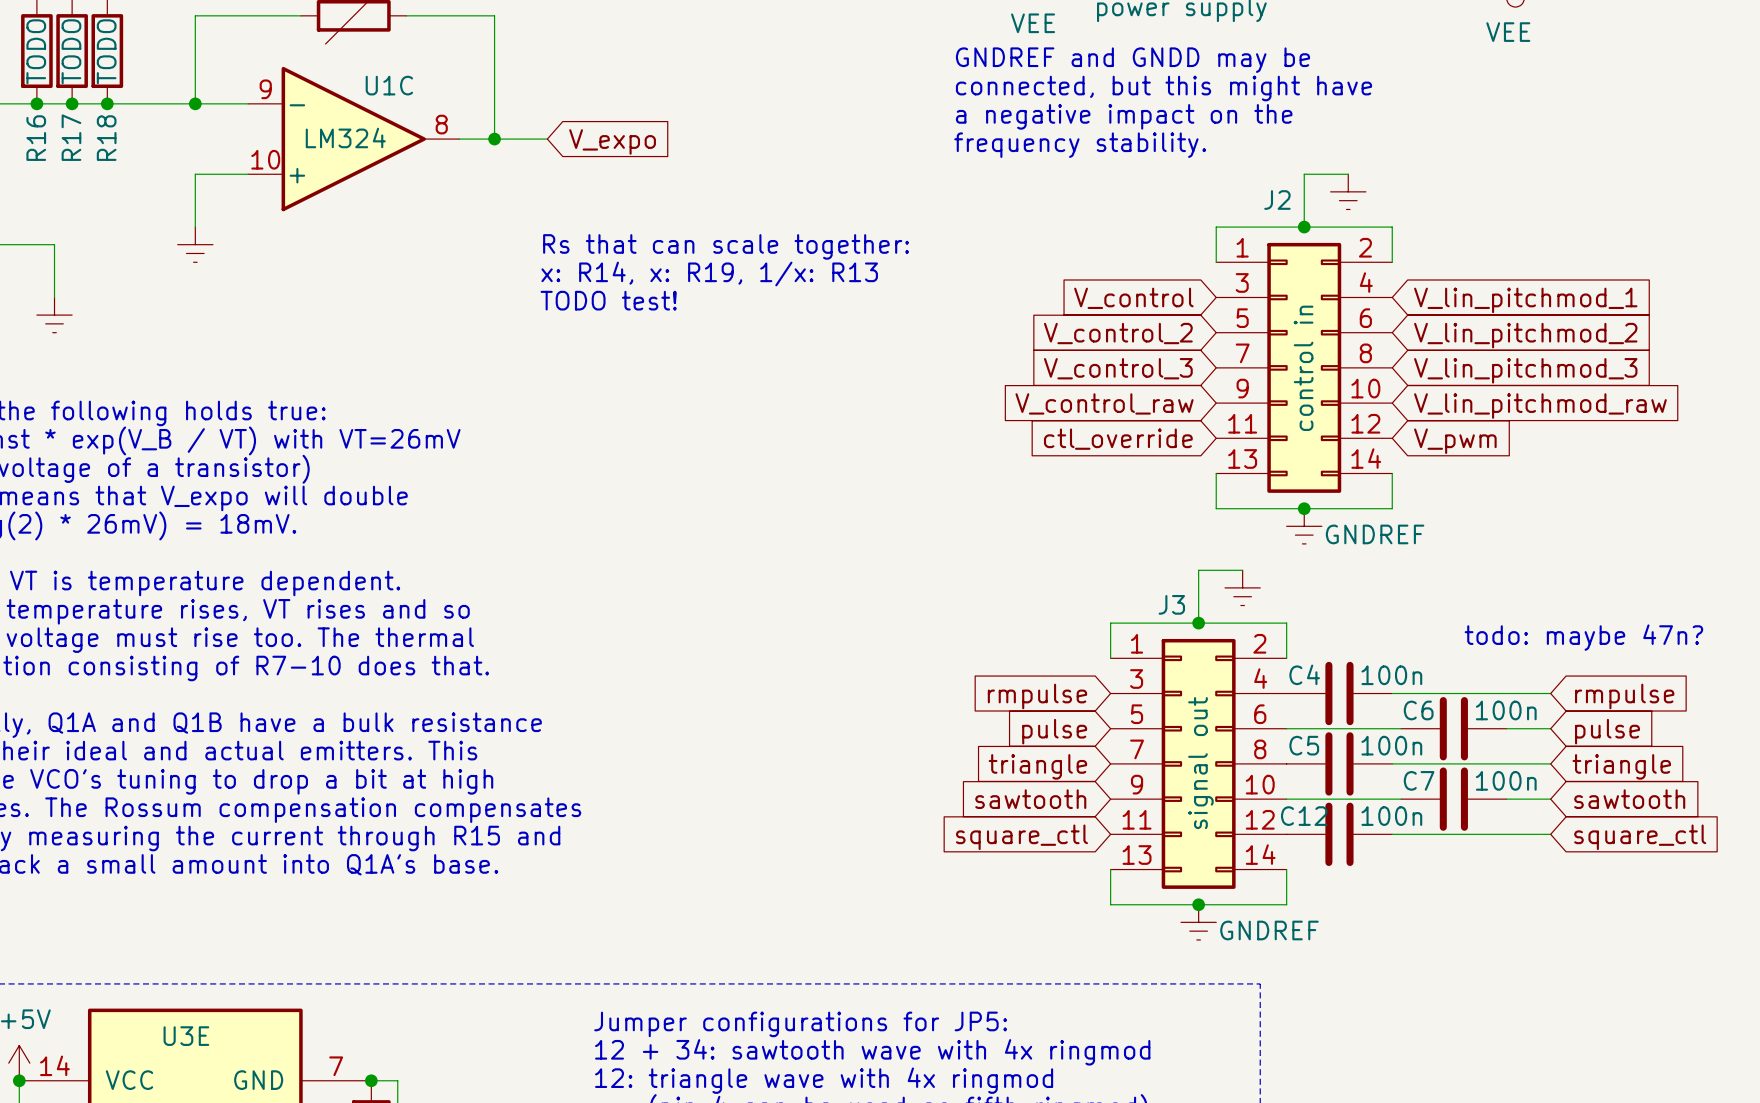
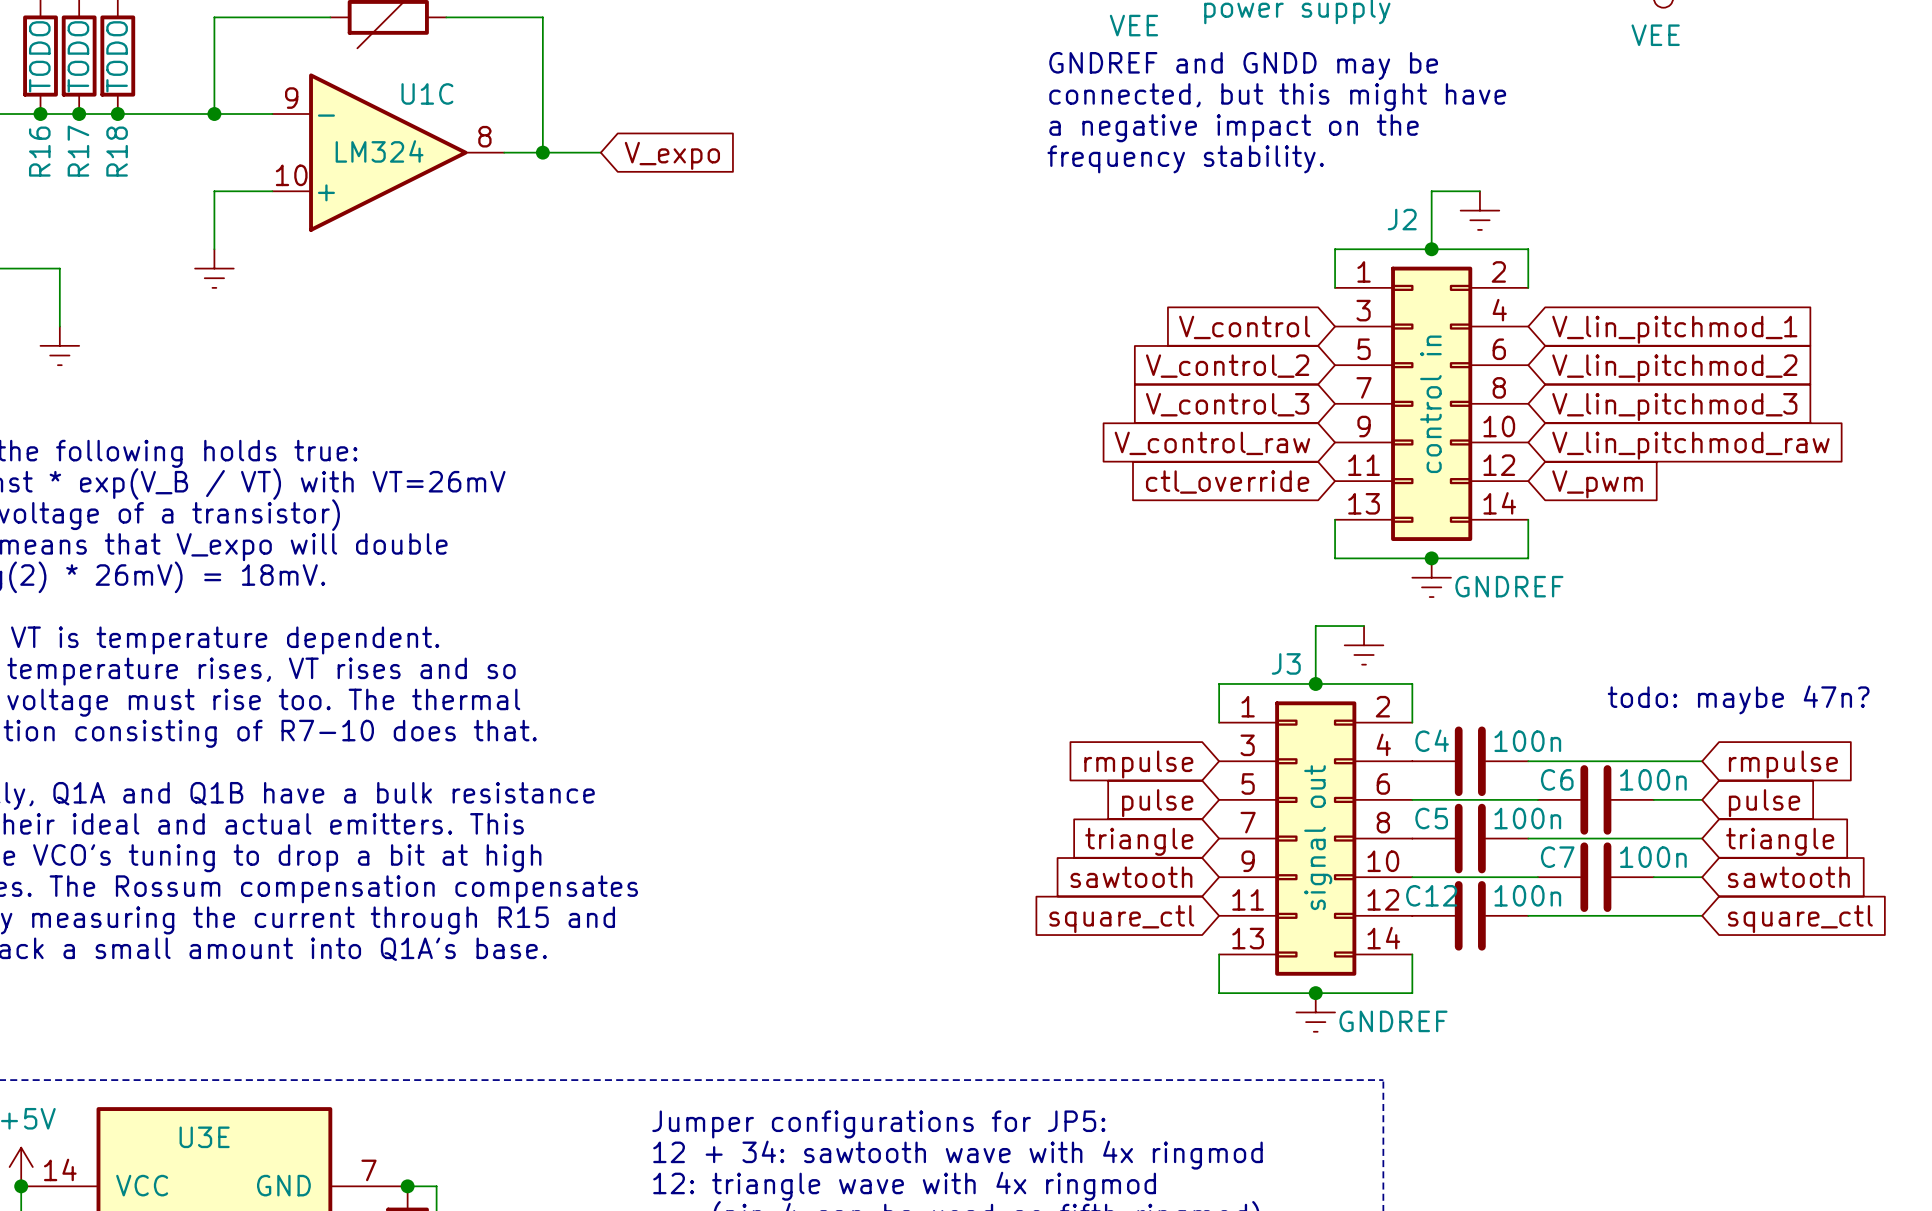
text: Rs that can scale together: (726, 246) -> none
text: x: R14, x: R19, 1/x: R13 (709, 273) -> none
text: TODO test! (608, 300) -> none

